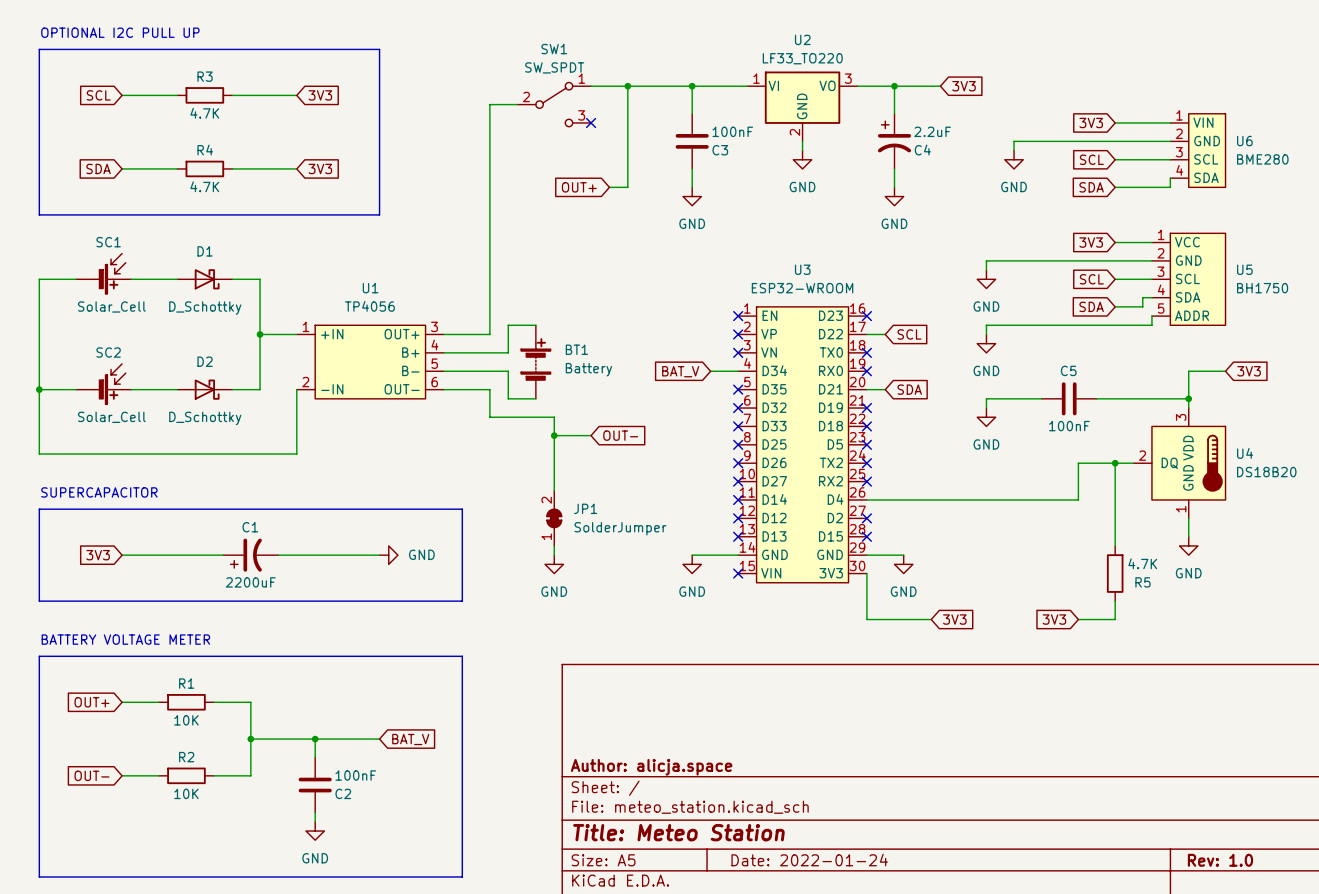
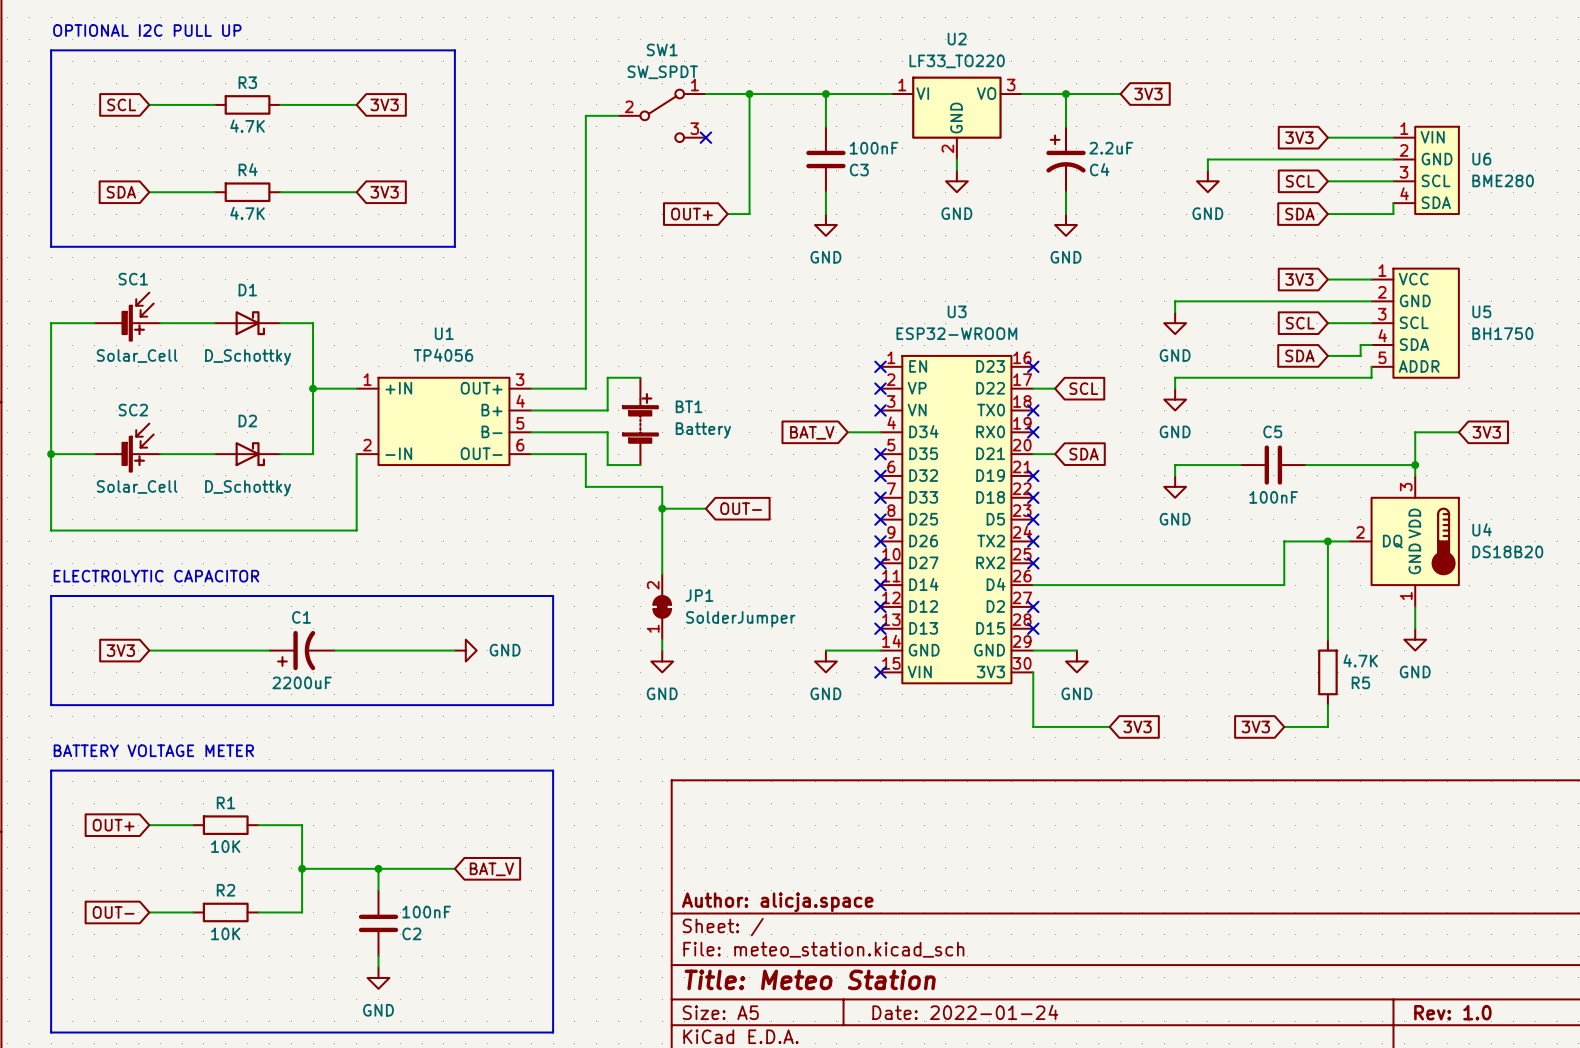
text: SUPERCAPACITOR (99, 492) -> ELECTROLYTIC CAPACITOR (156, 576)

